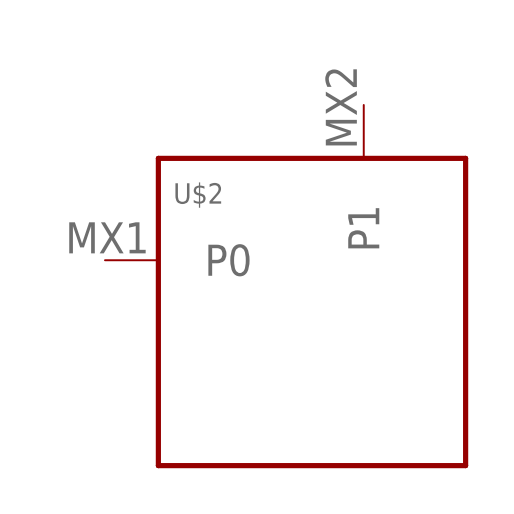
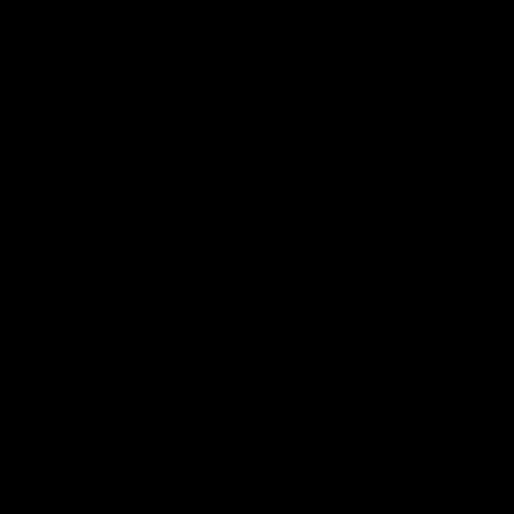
U$2: (286, 286) -> none

